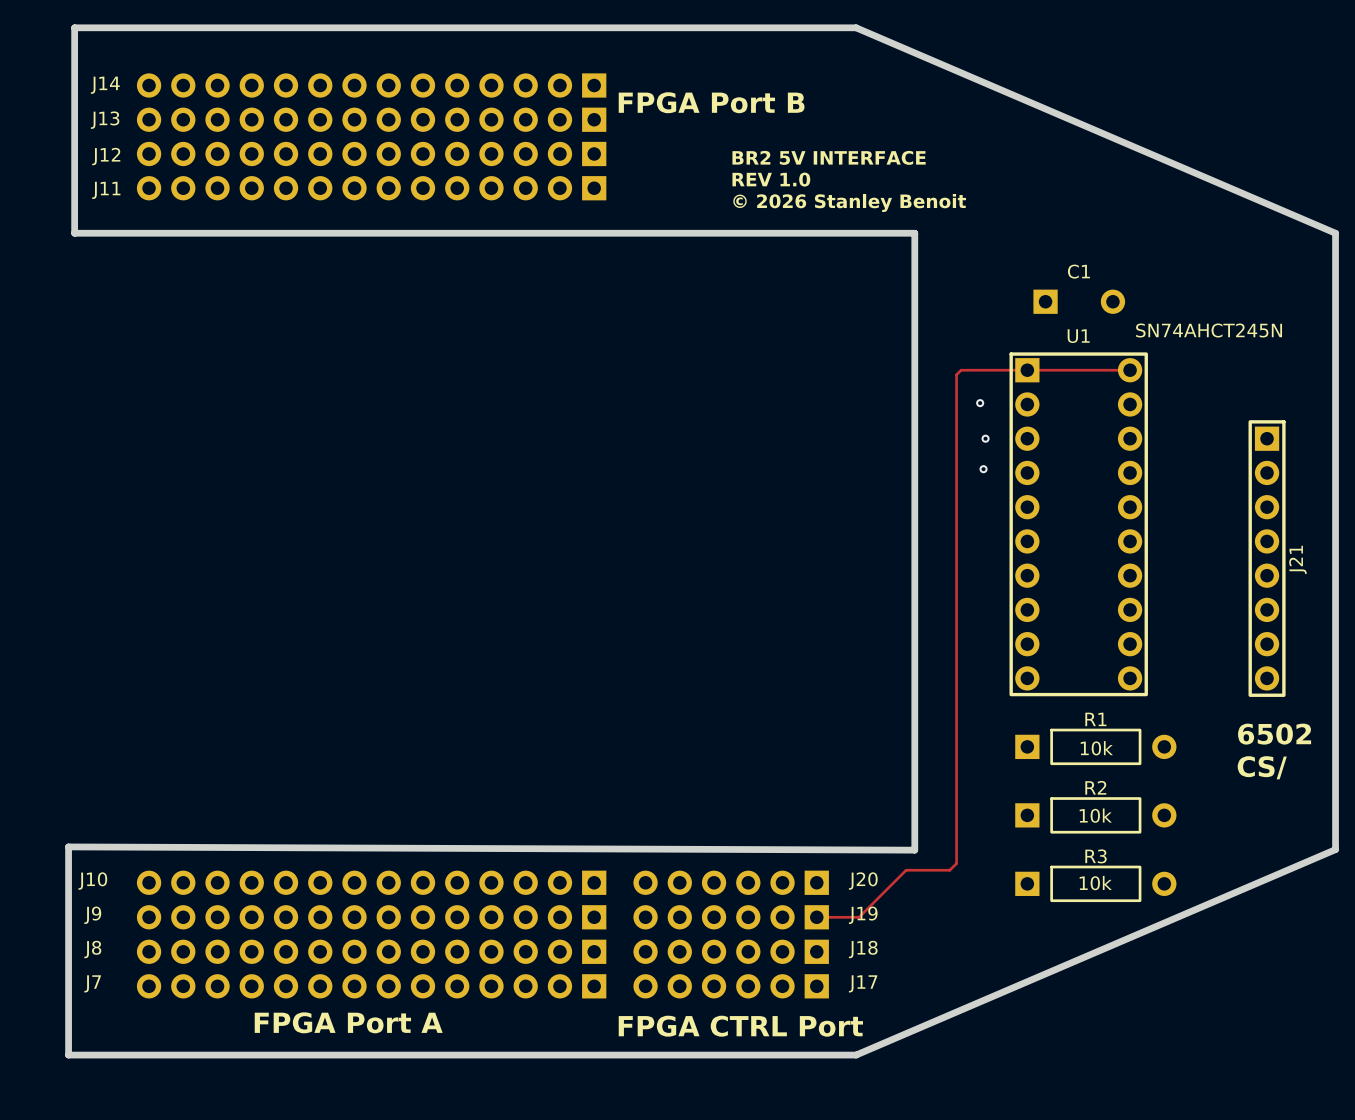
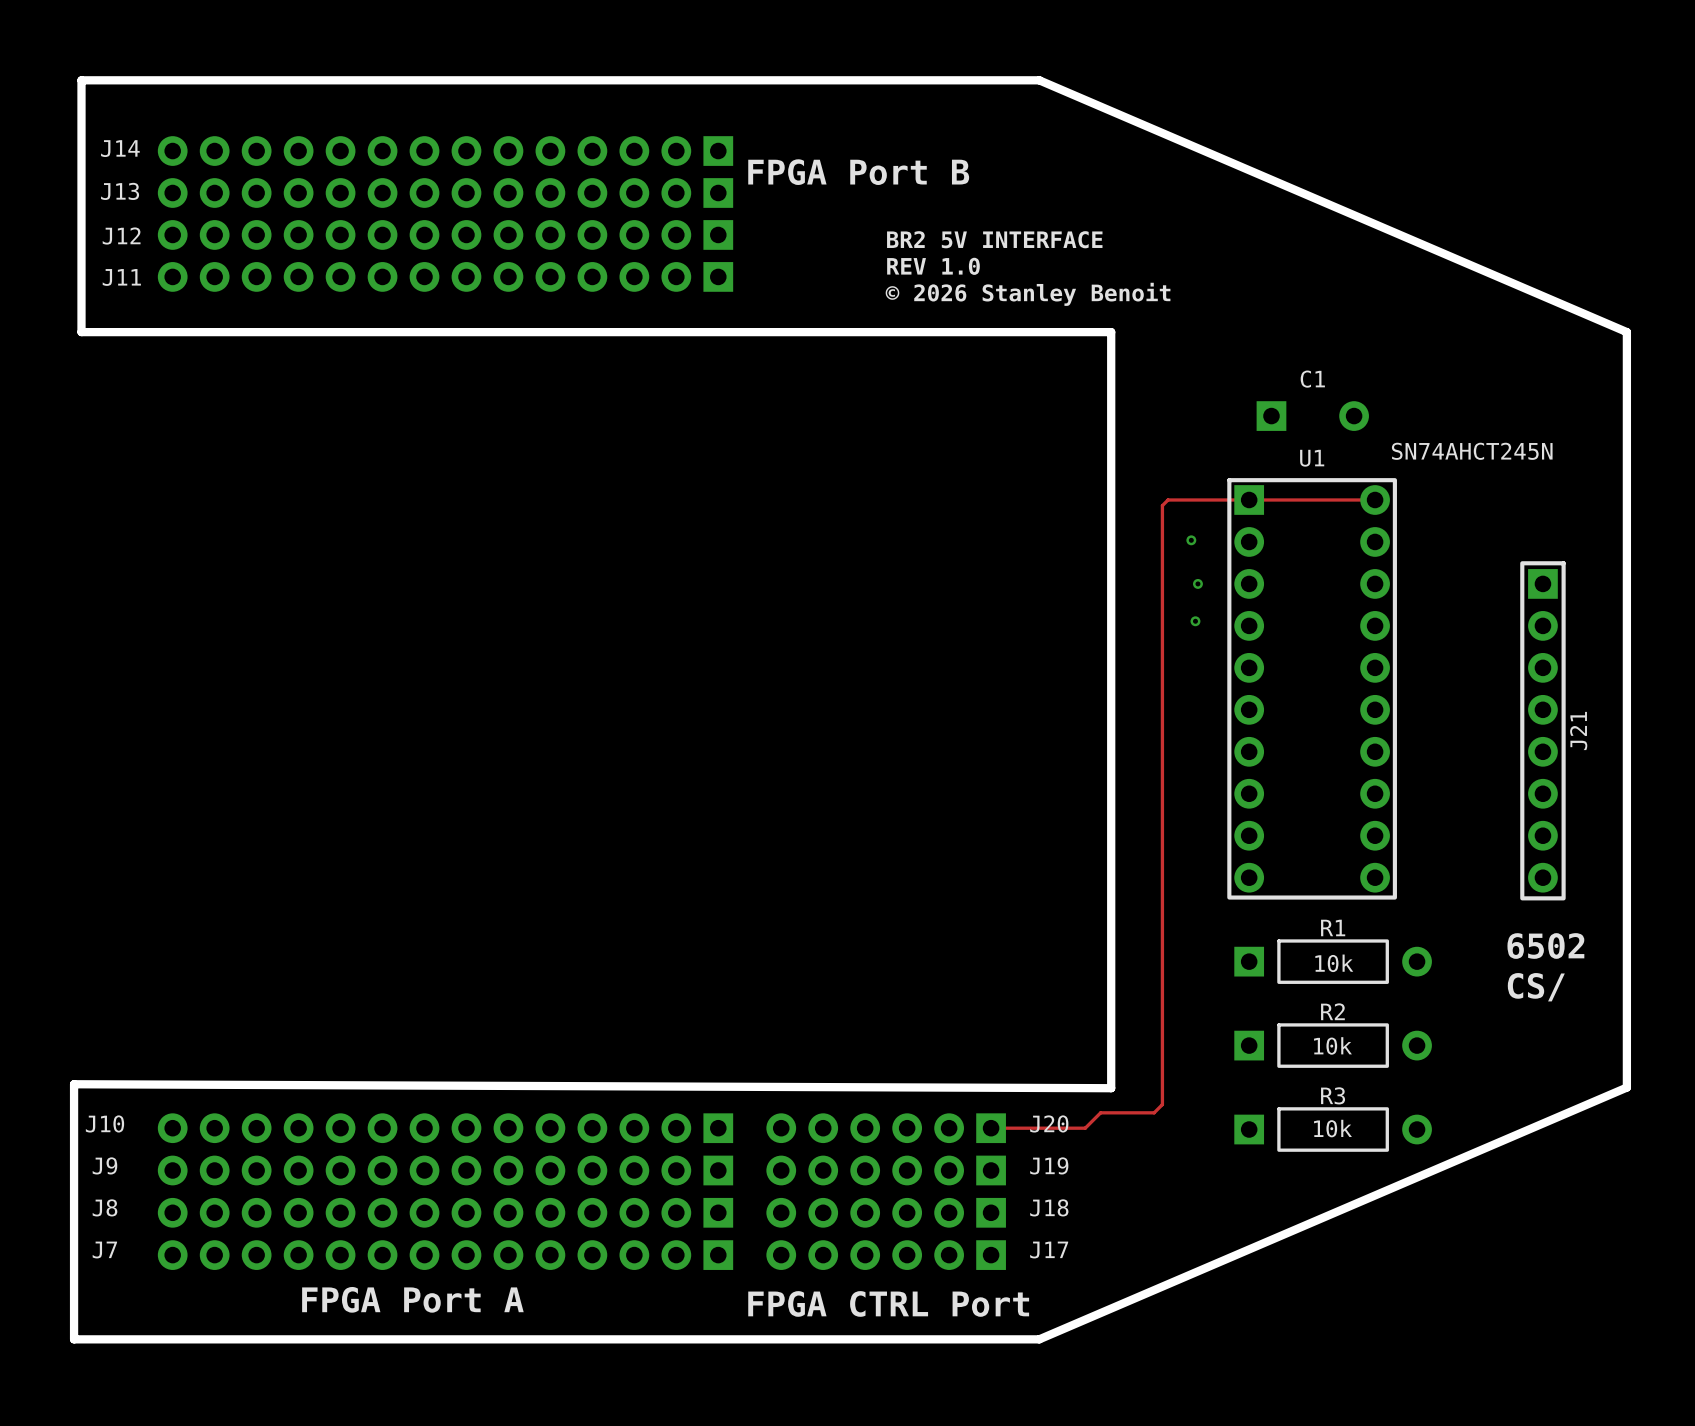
track: (893, 882) (859, 917) (816, 917) -> (1085, 1128) (991, 1128)

